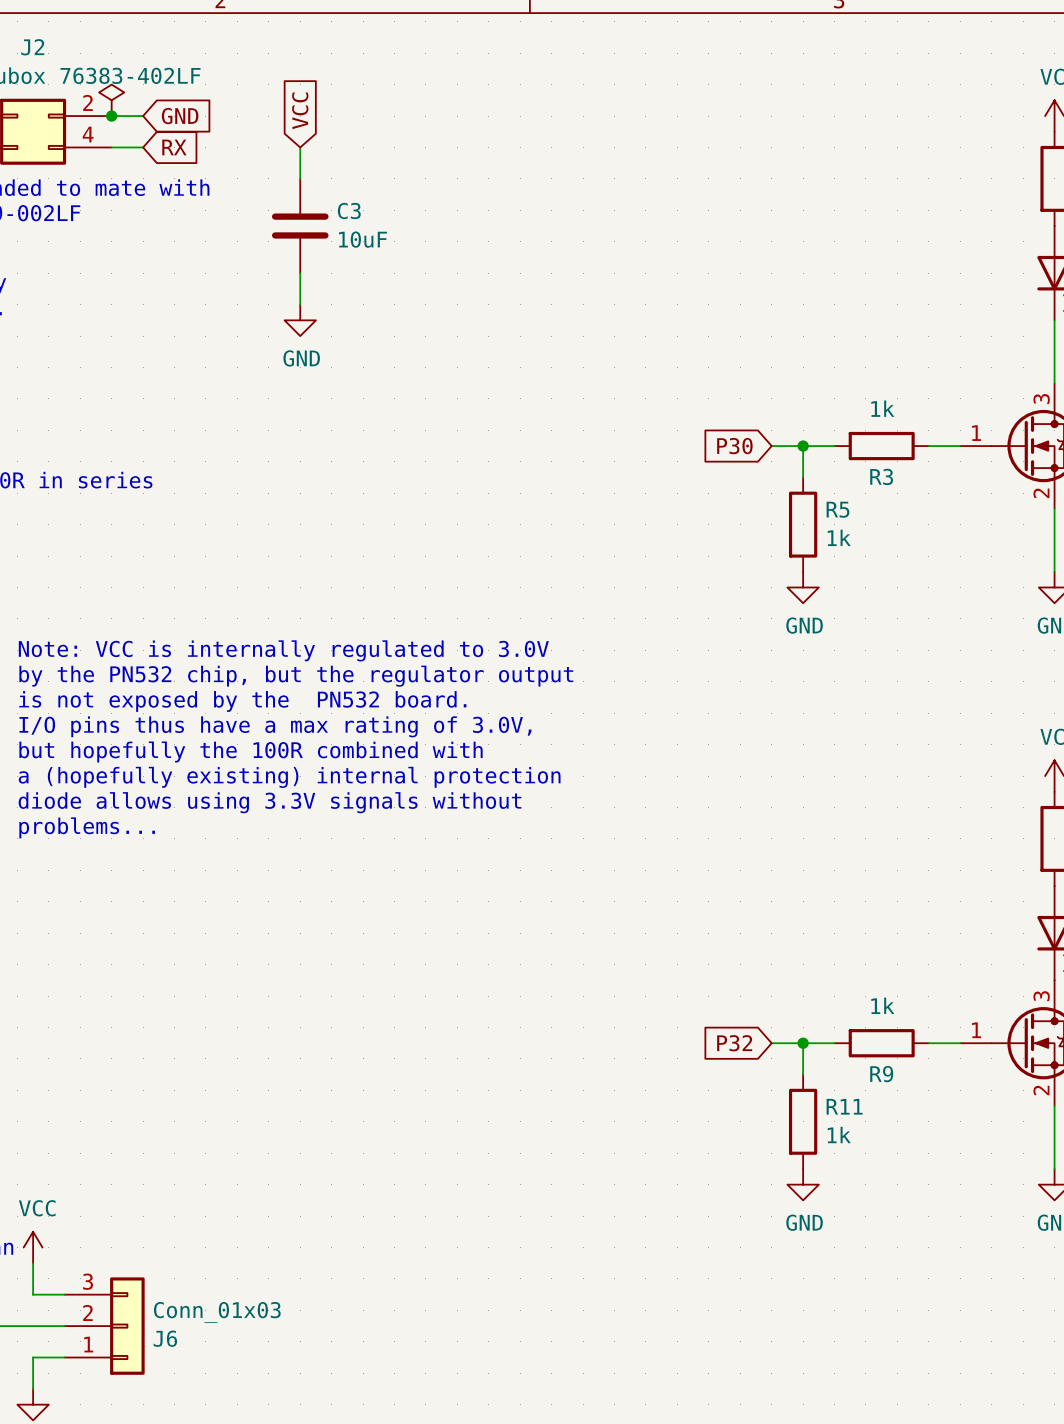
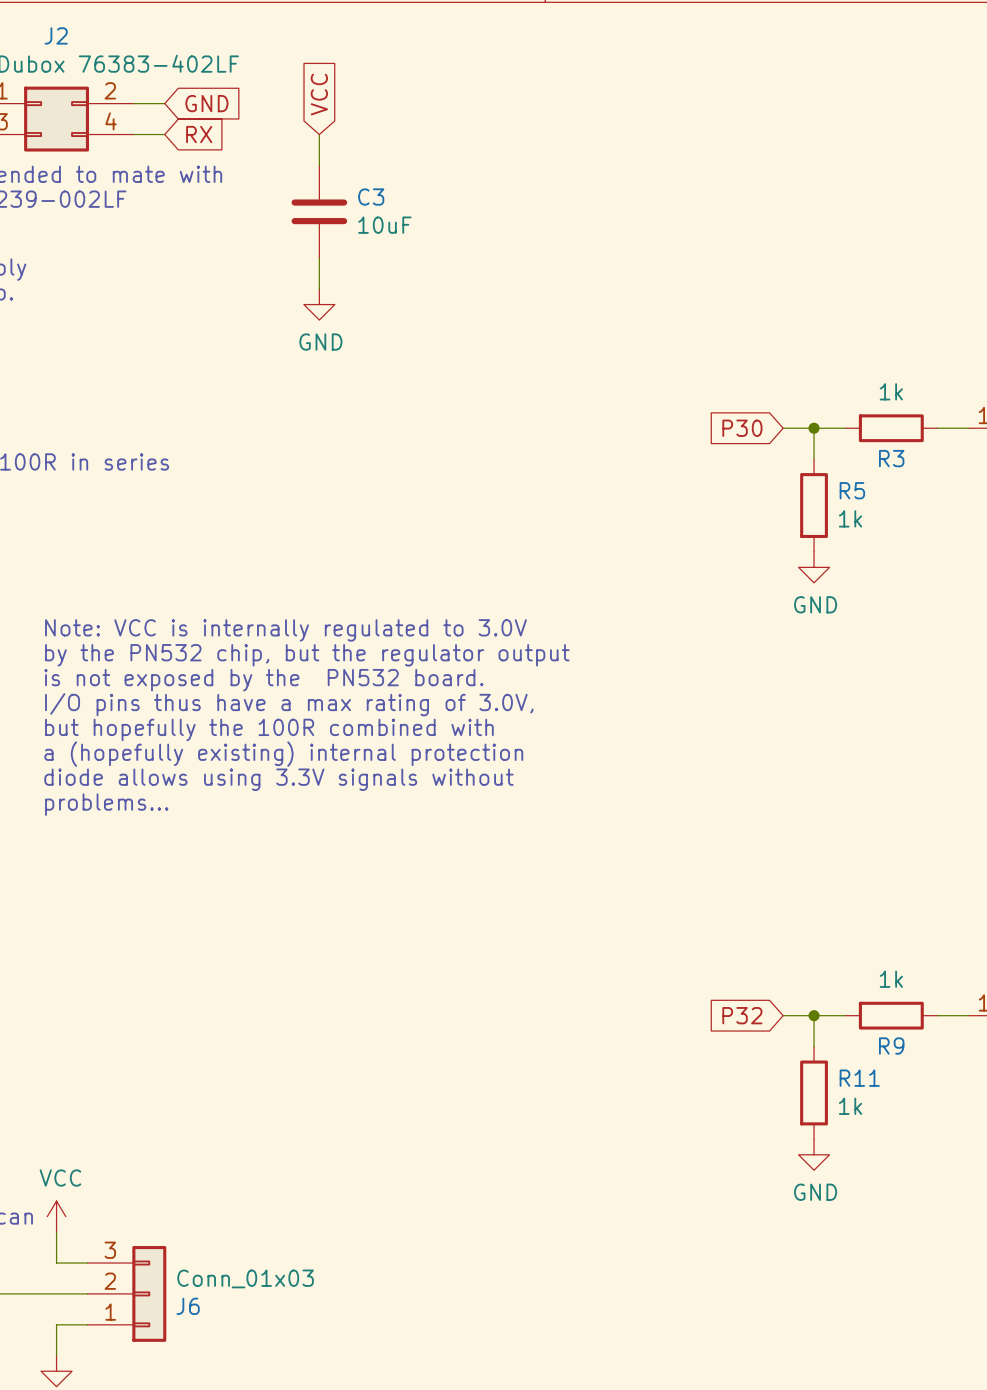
power symbol: (111, 100) -> none
junction: (111, 116) -> none

